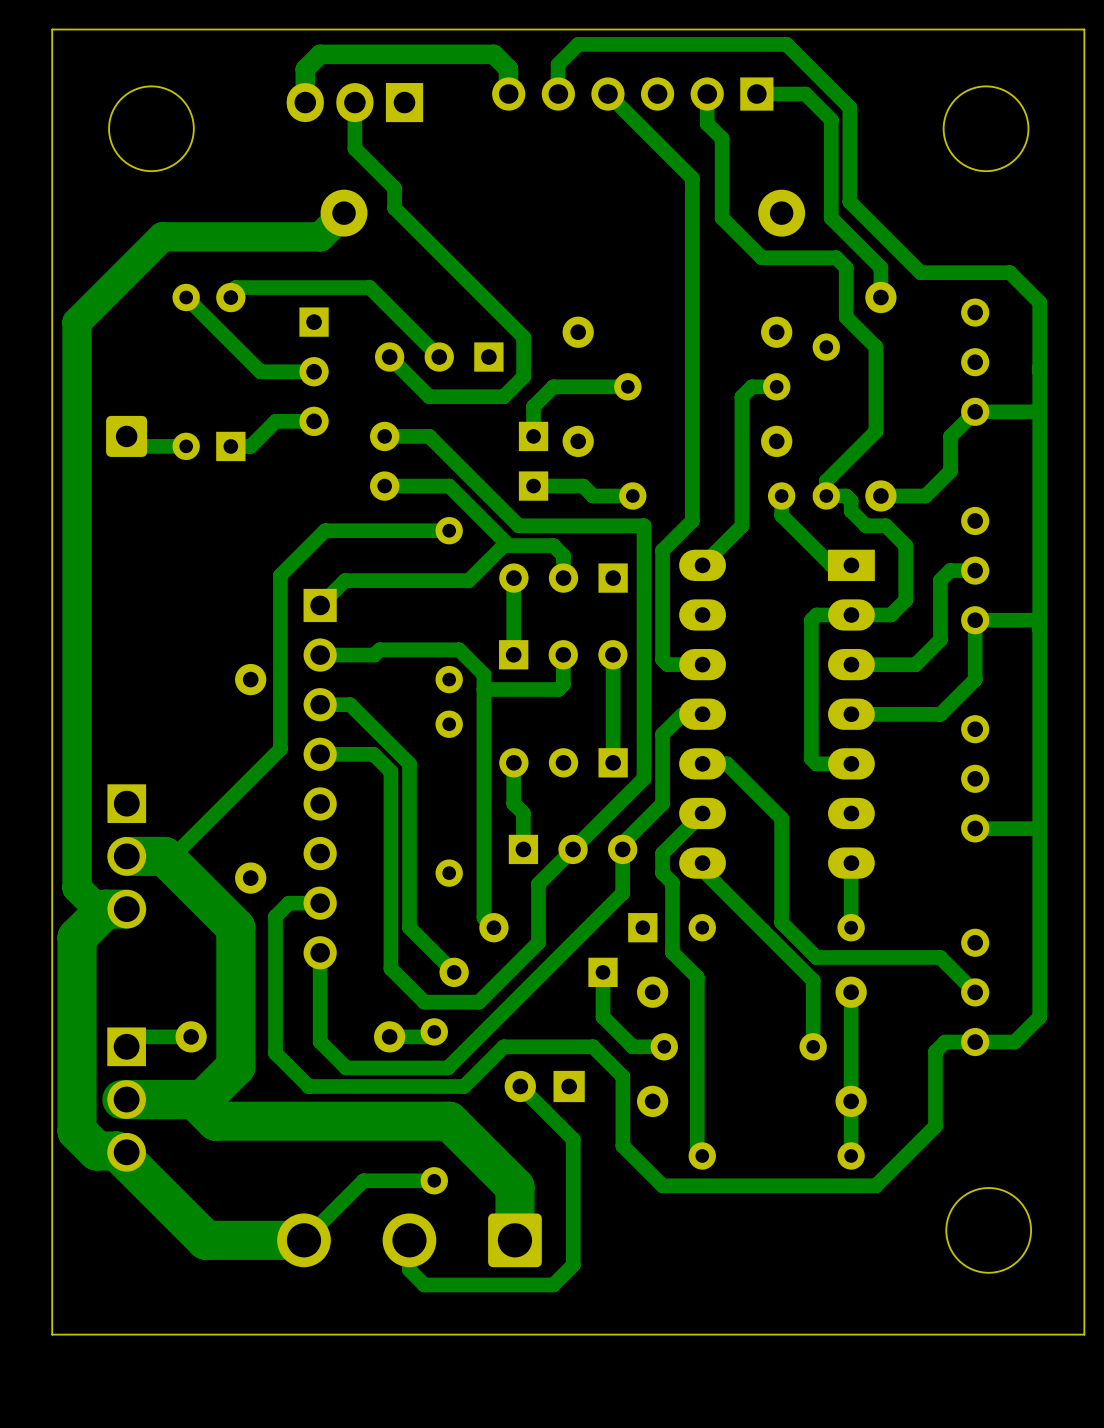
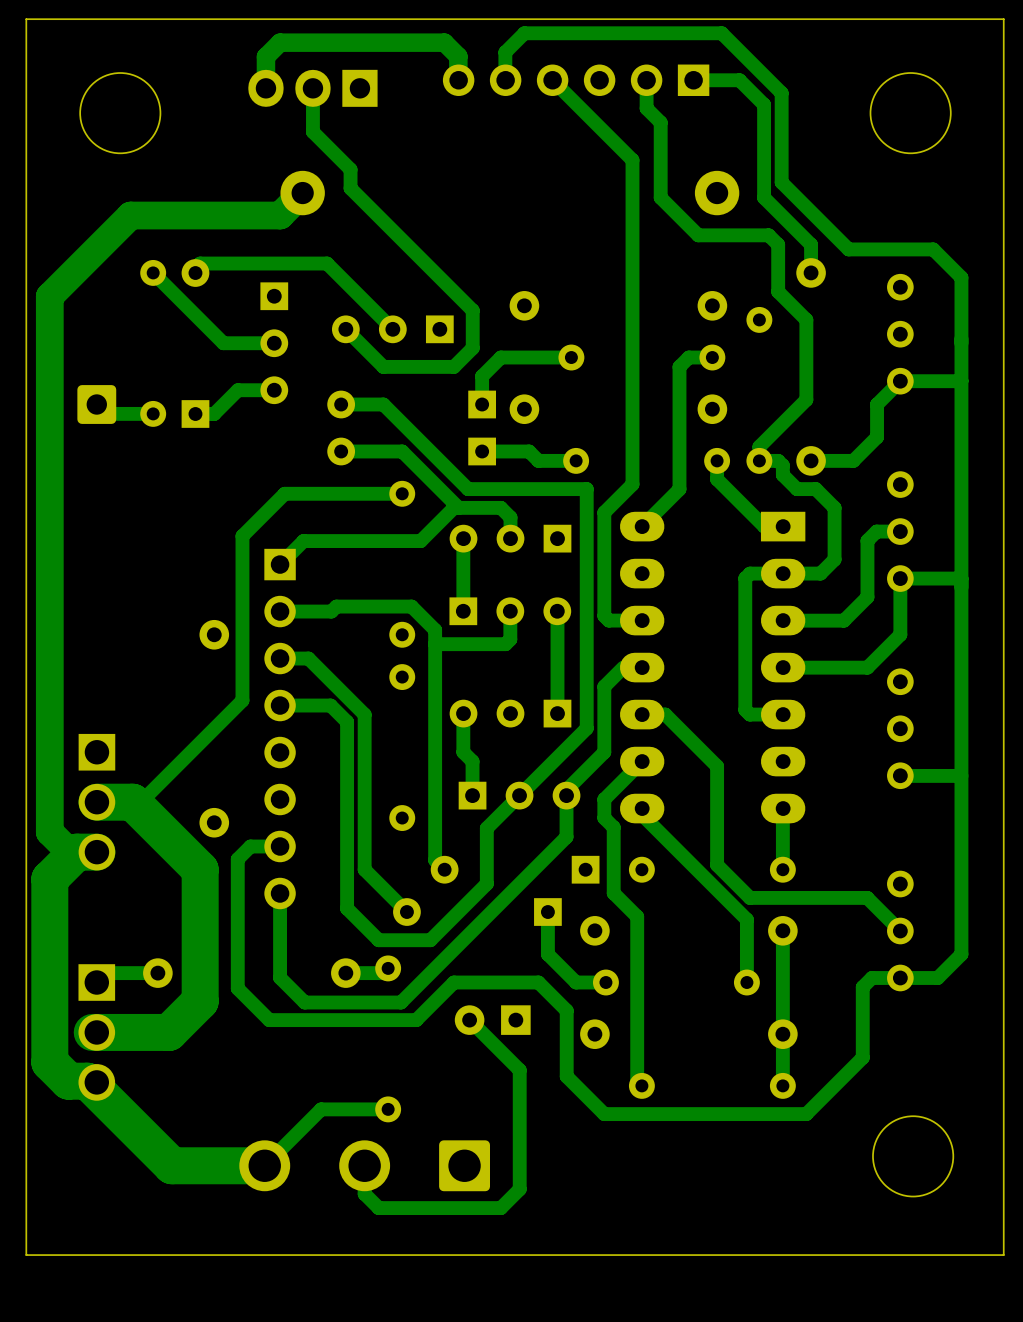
track: (194, 1099) (215, 1121) (449, 1121) (514, 1187) (514, 1240) -> none

